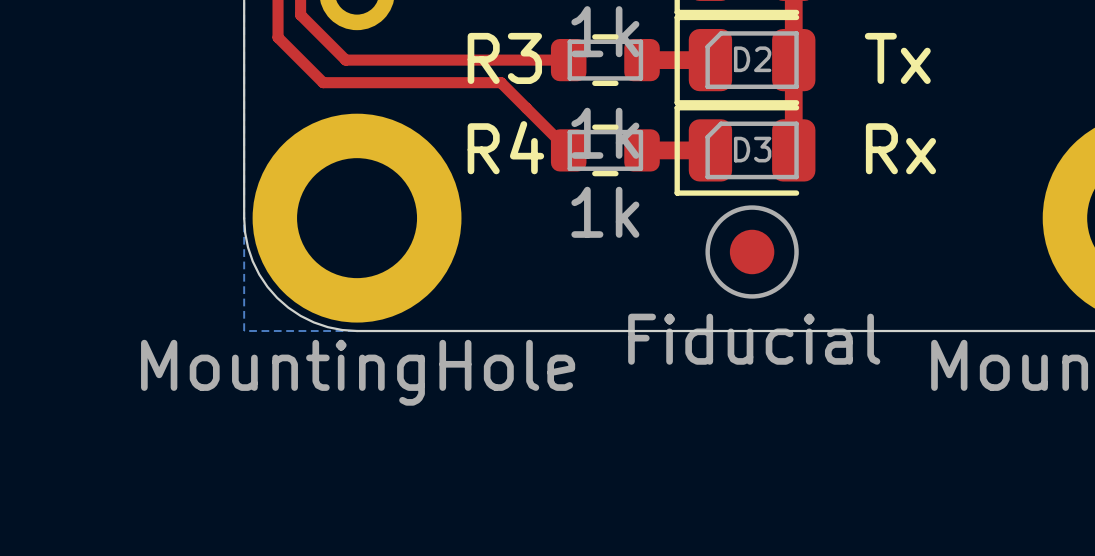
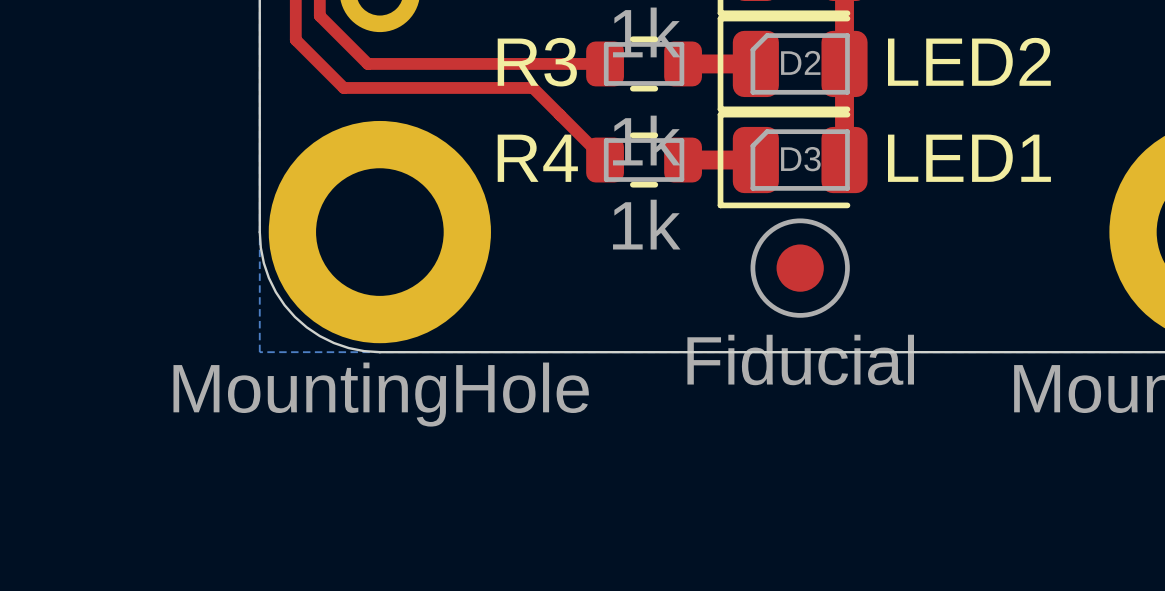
D2 value: Tx (897, 58) -> LED2 (969, 61)
D3 value: Rx (900, 148) -> LED1 (969, 158)

